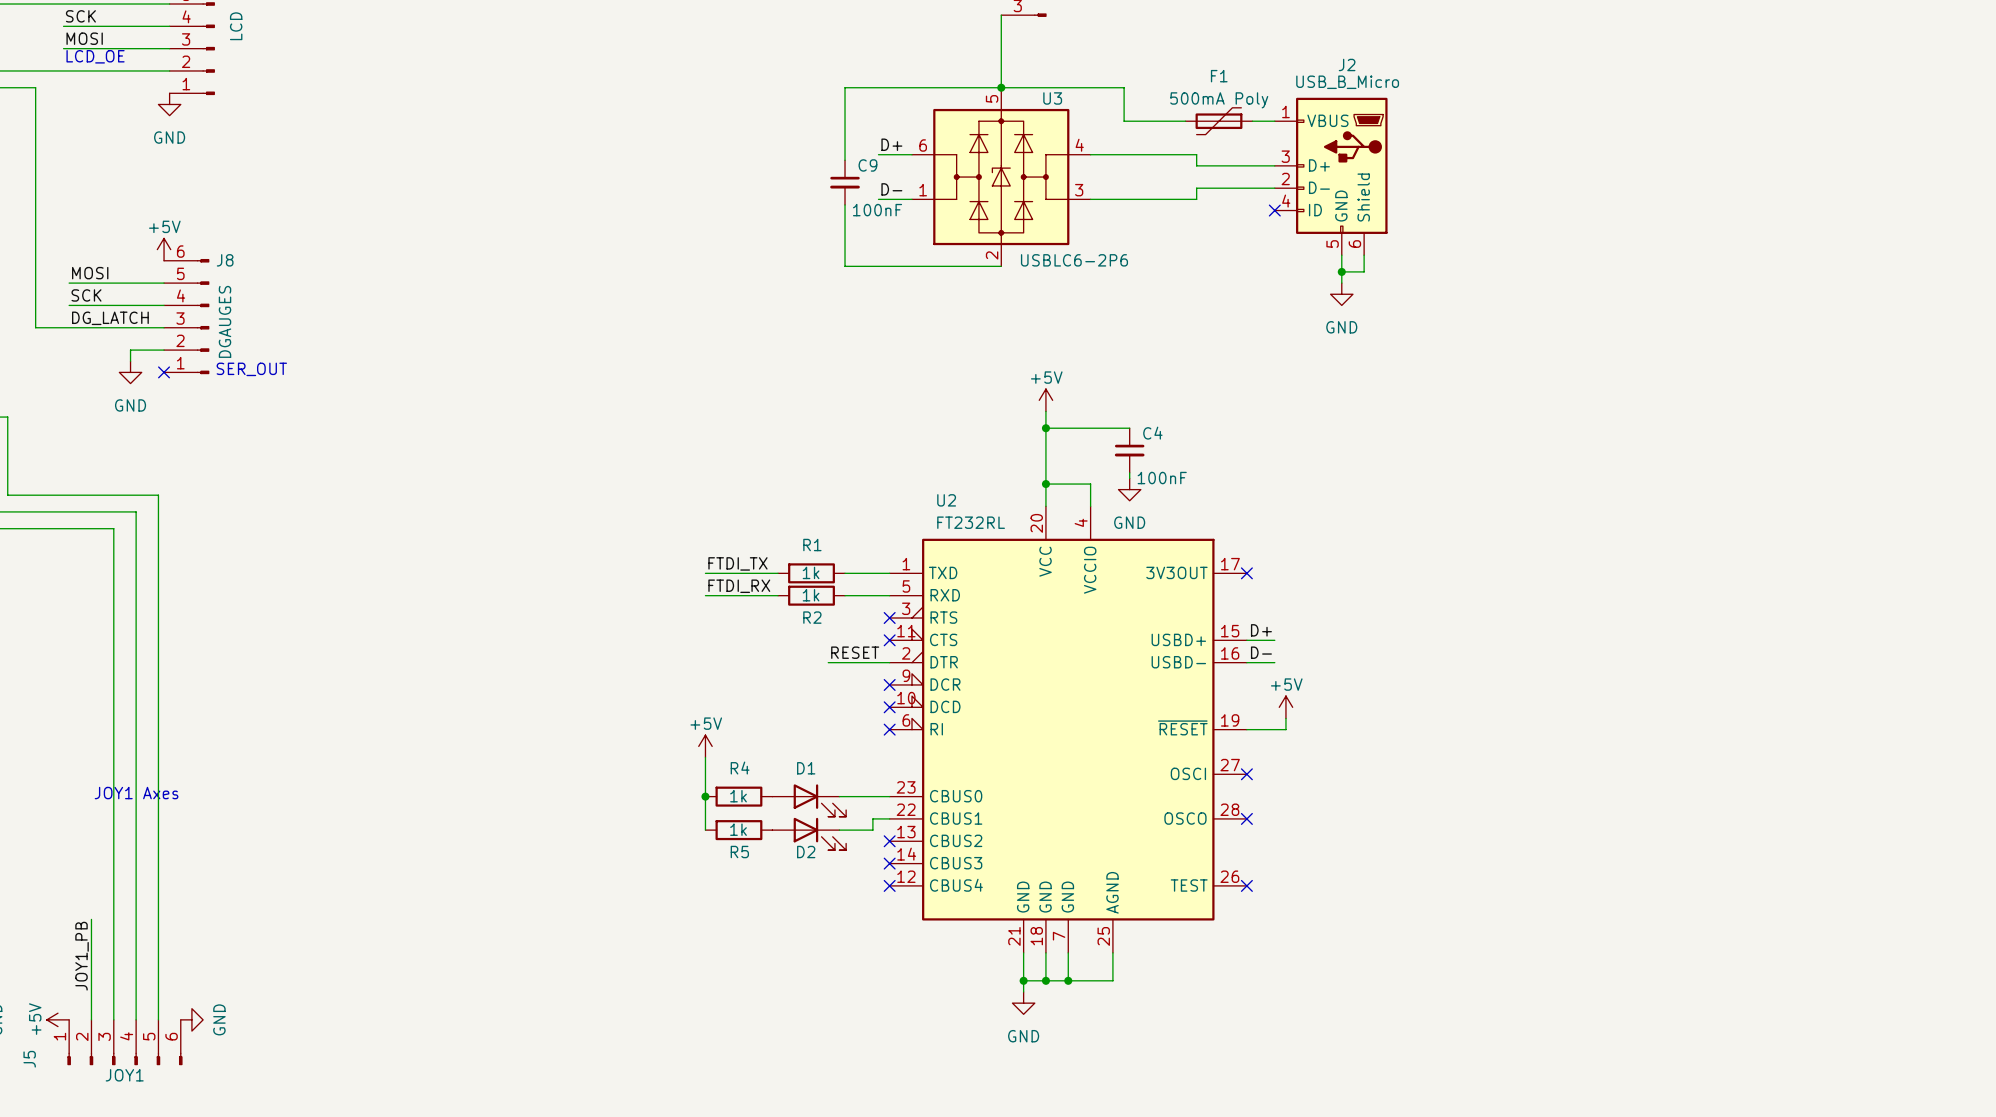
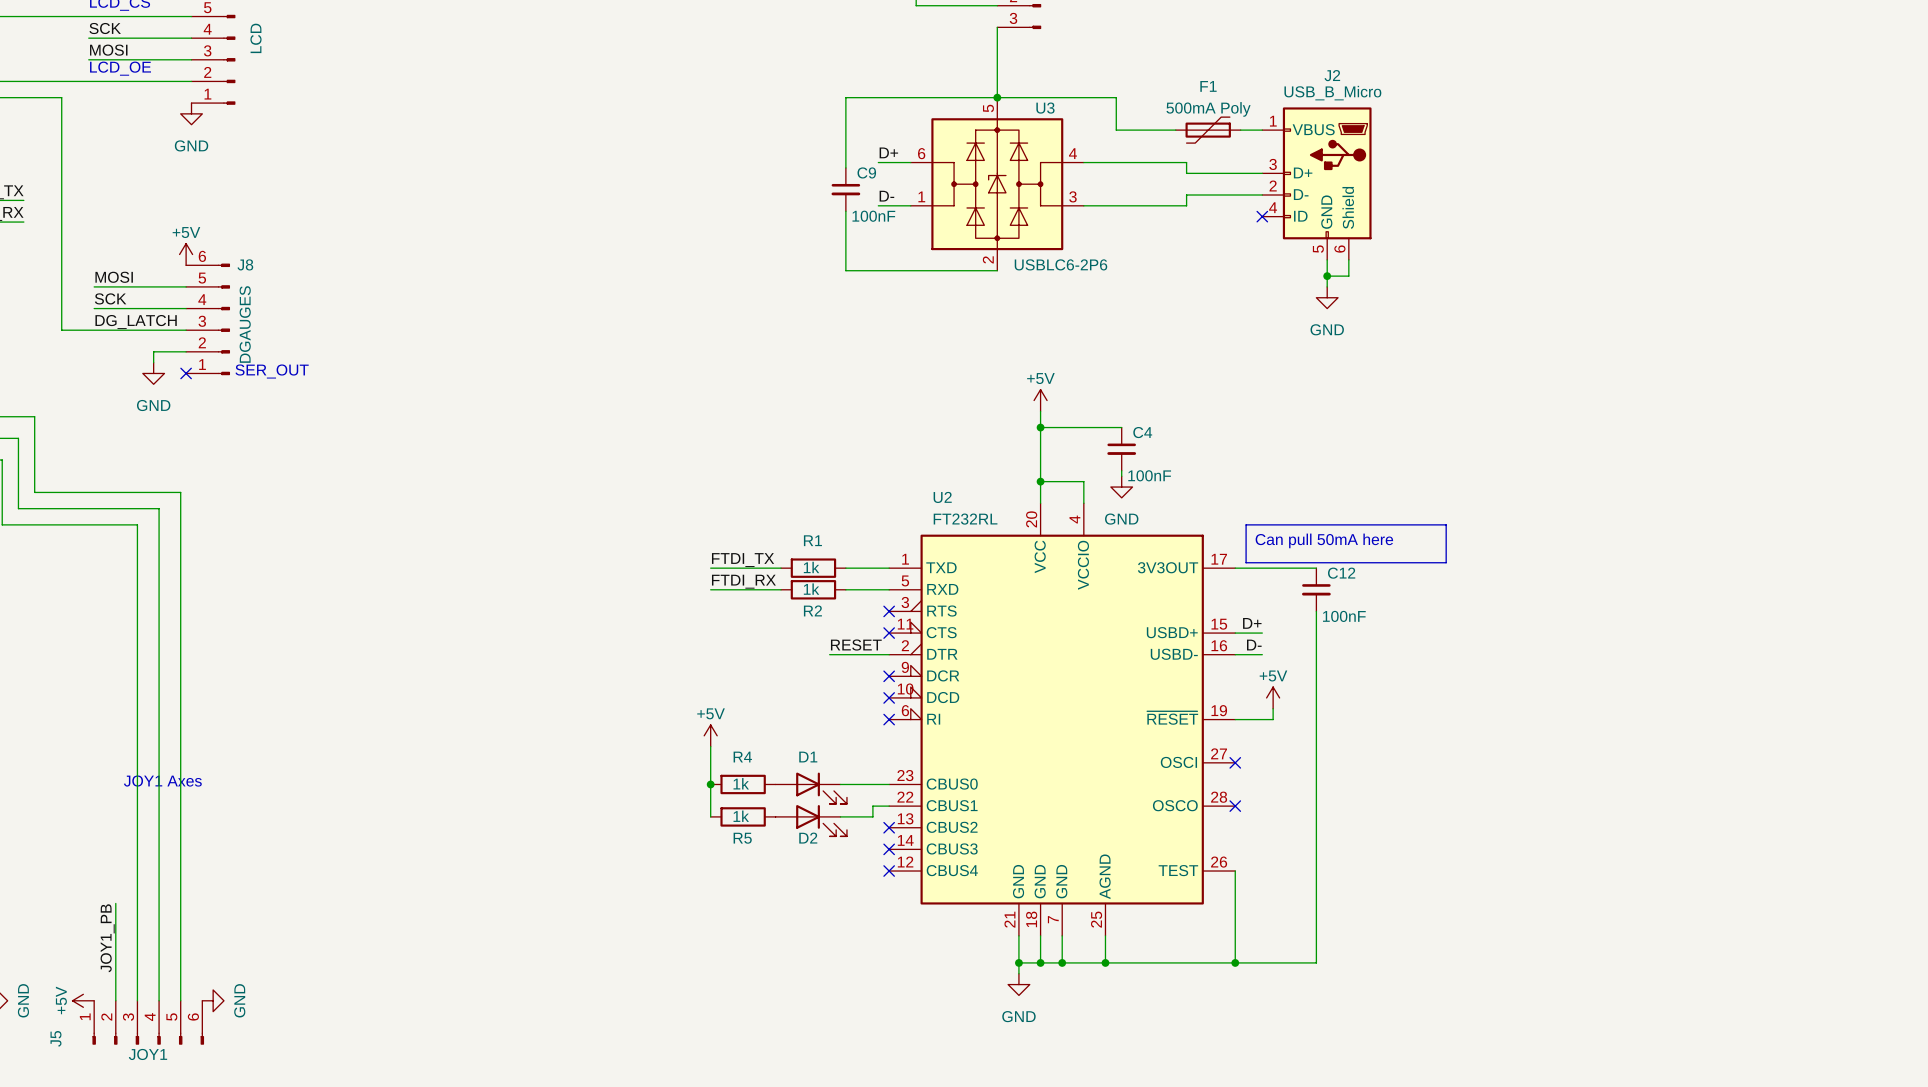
line: none -> (1246, 524) (1446, 524) (1446, 562) (1246, 562) (1246, 524)
text: none -> Can pull 50mA here (1324, 540)
wire: none -> (1235, 568) (1316, 568)
no-connect mark: (1246, 573) -> none
C12: none -> 100nF (1316, 589)
wire: none -> (1316, 611) (1316, 962) (1105, 962)
wire: none -> (1235, 871) (1235, 962)
no-connect mark: (1246, 885) -> none
junction: none -> (1105, 962)
junction: none -> (1235, 962)

